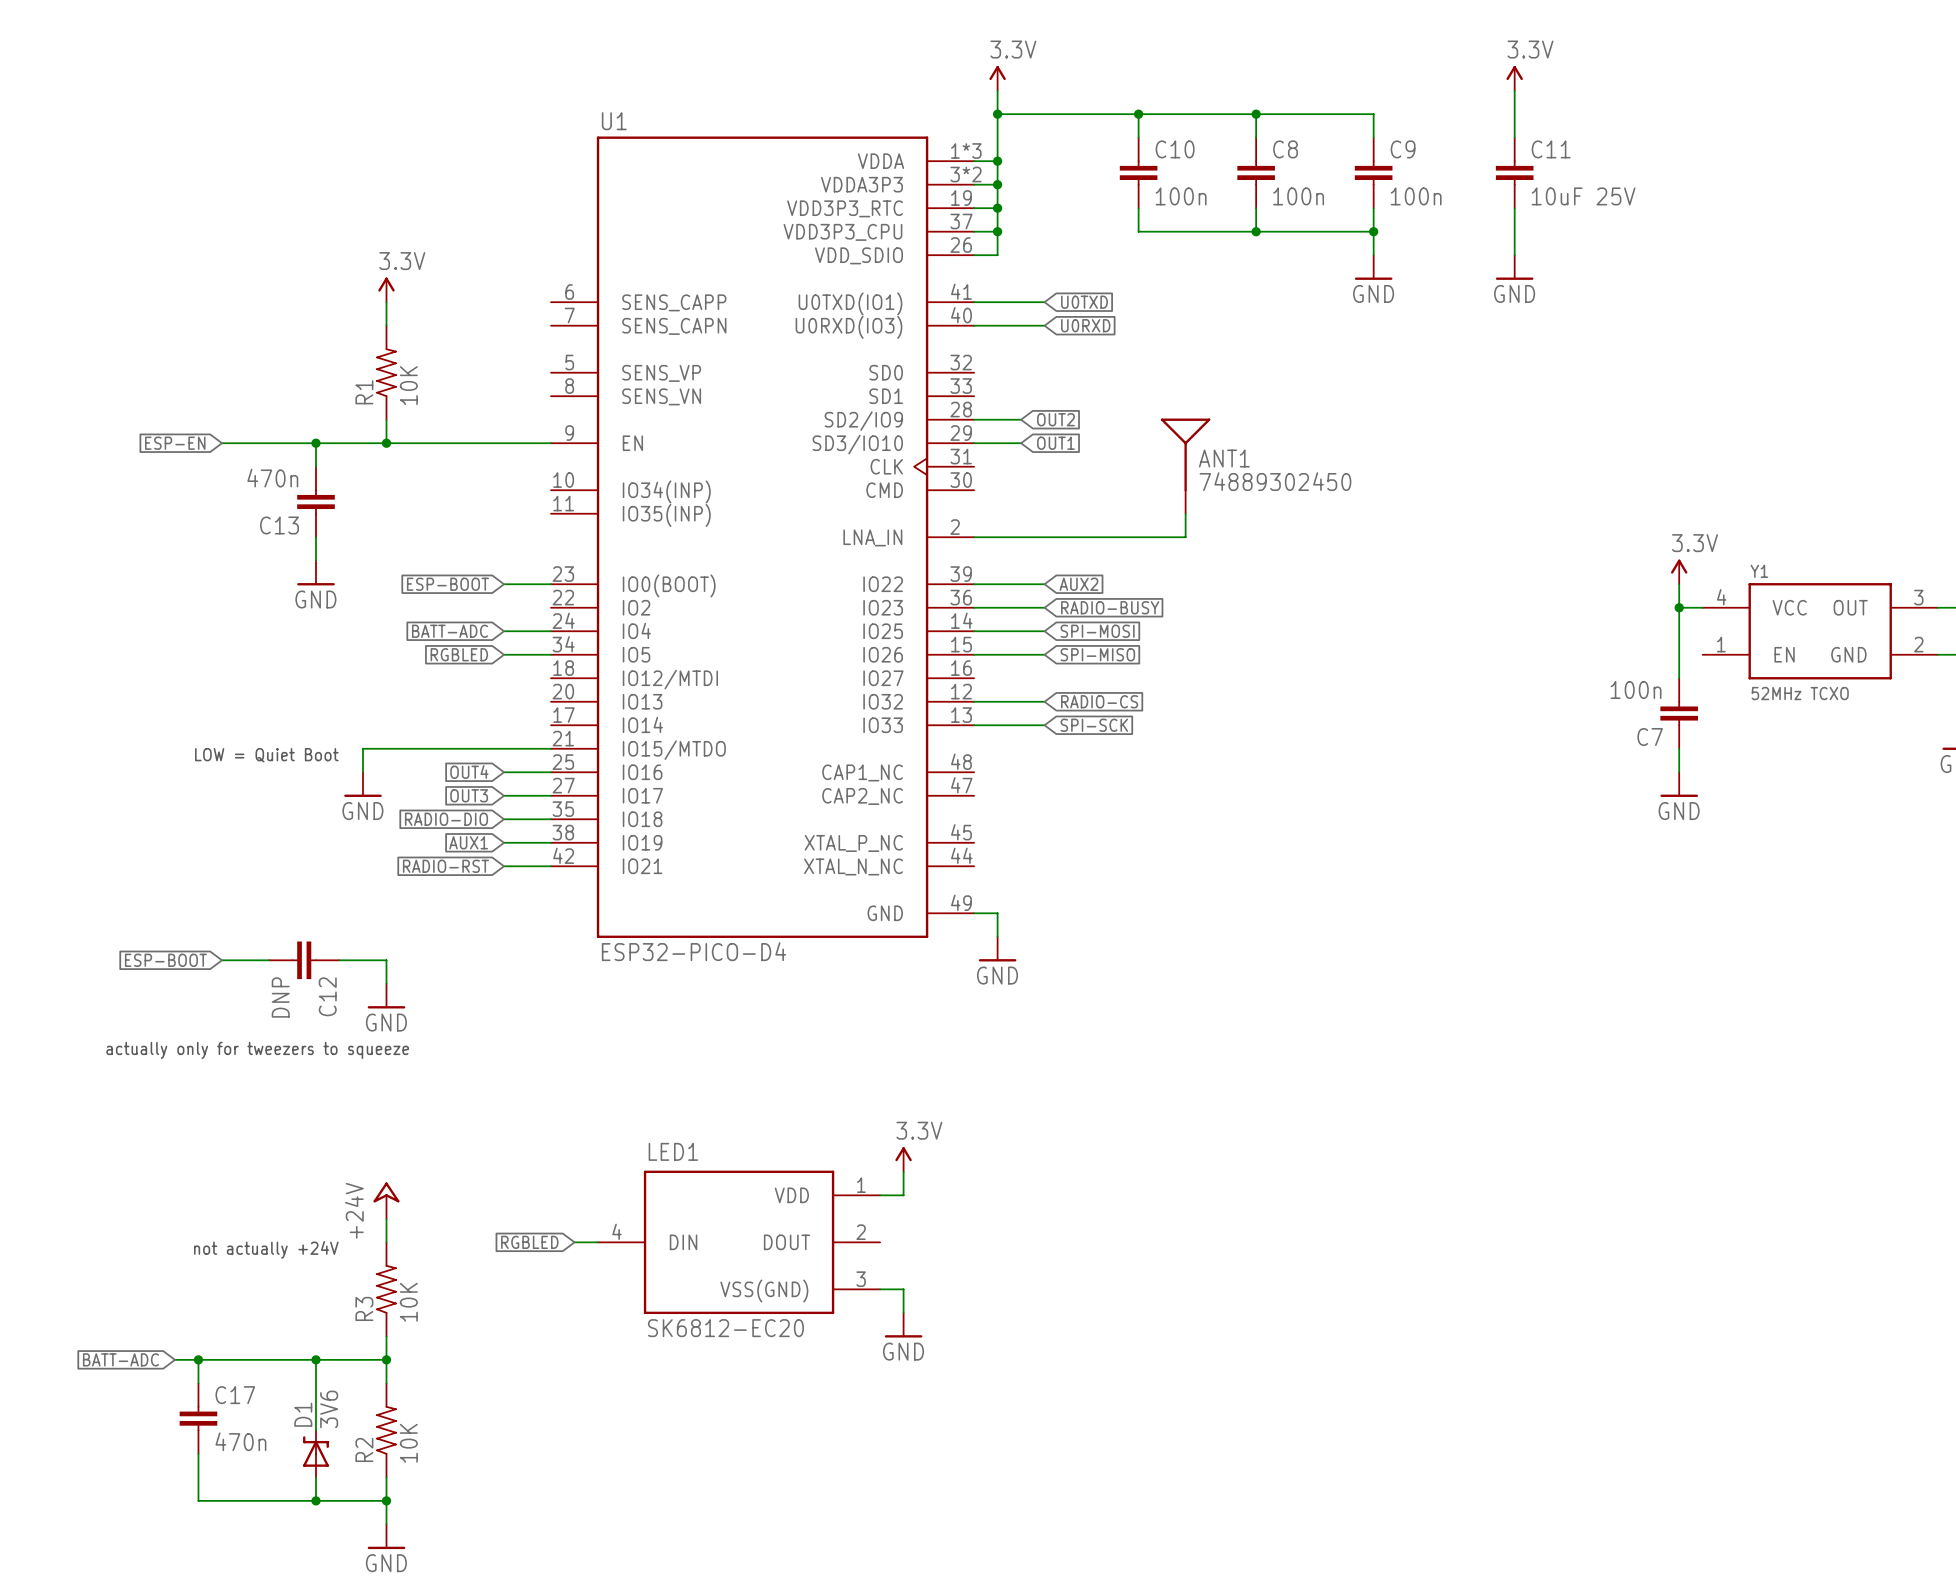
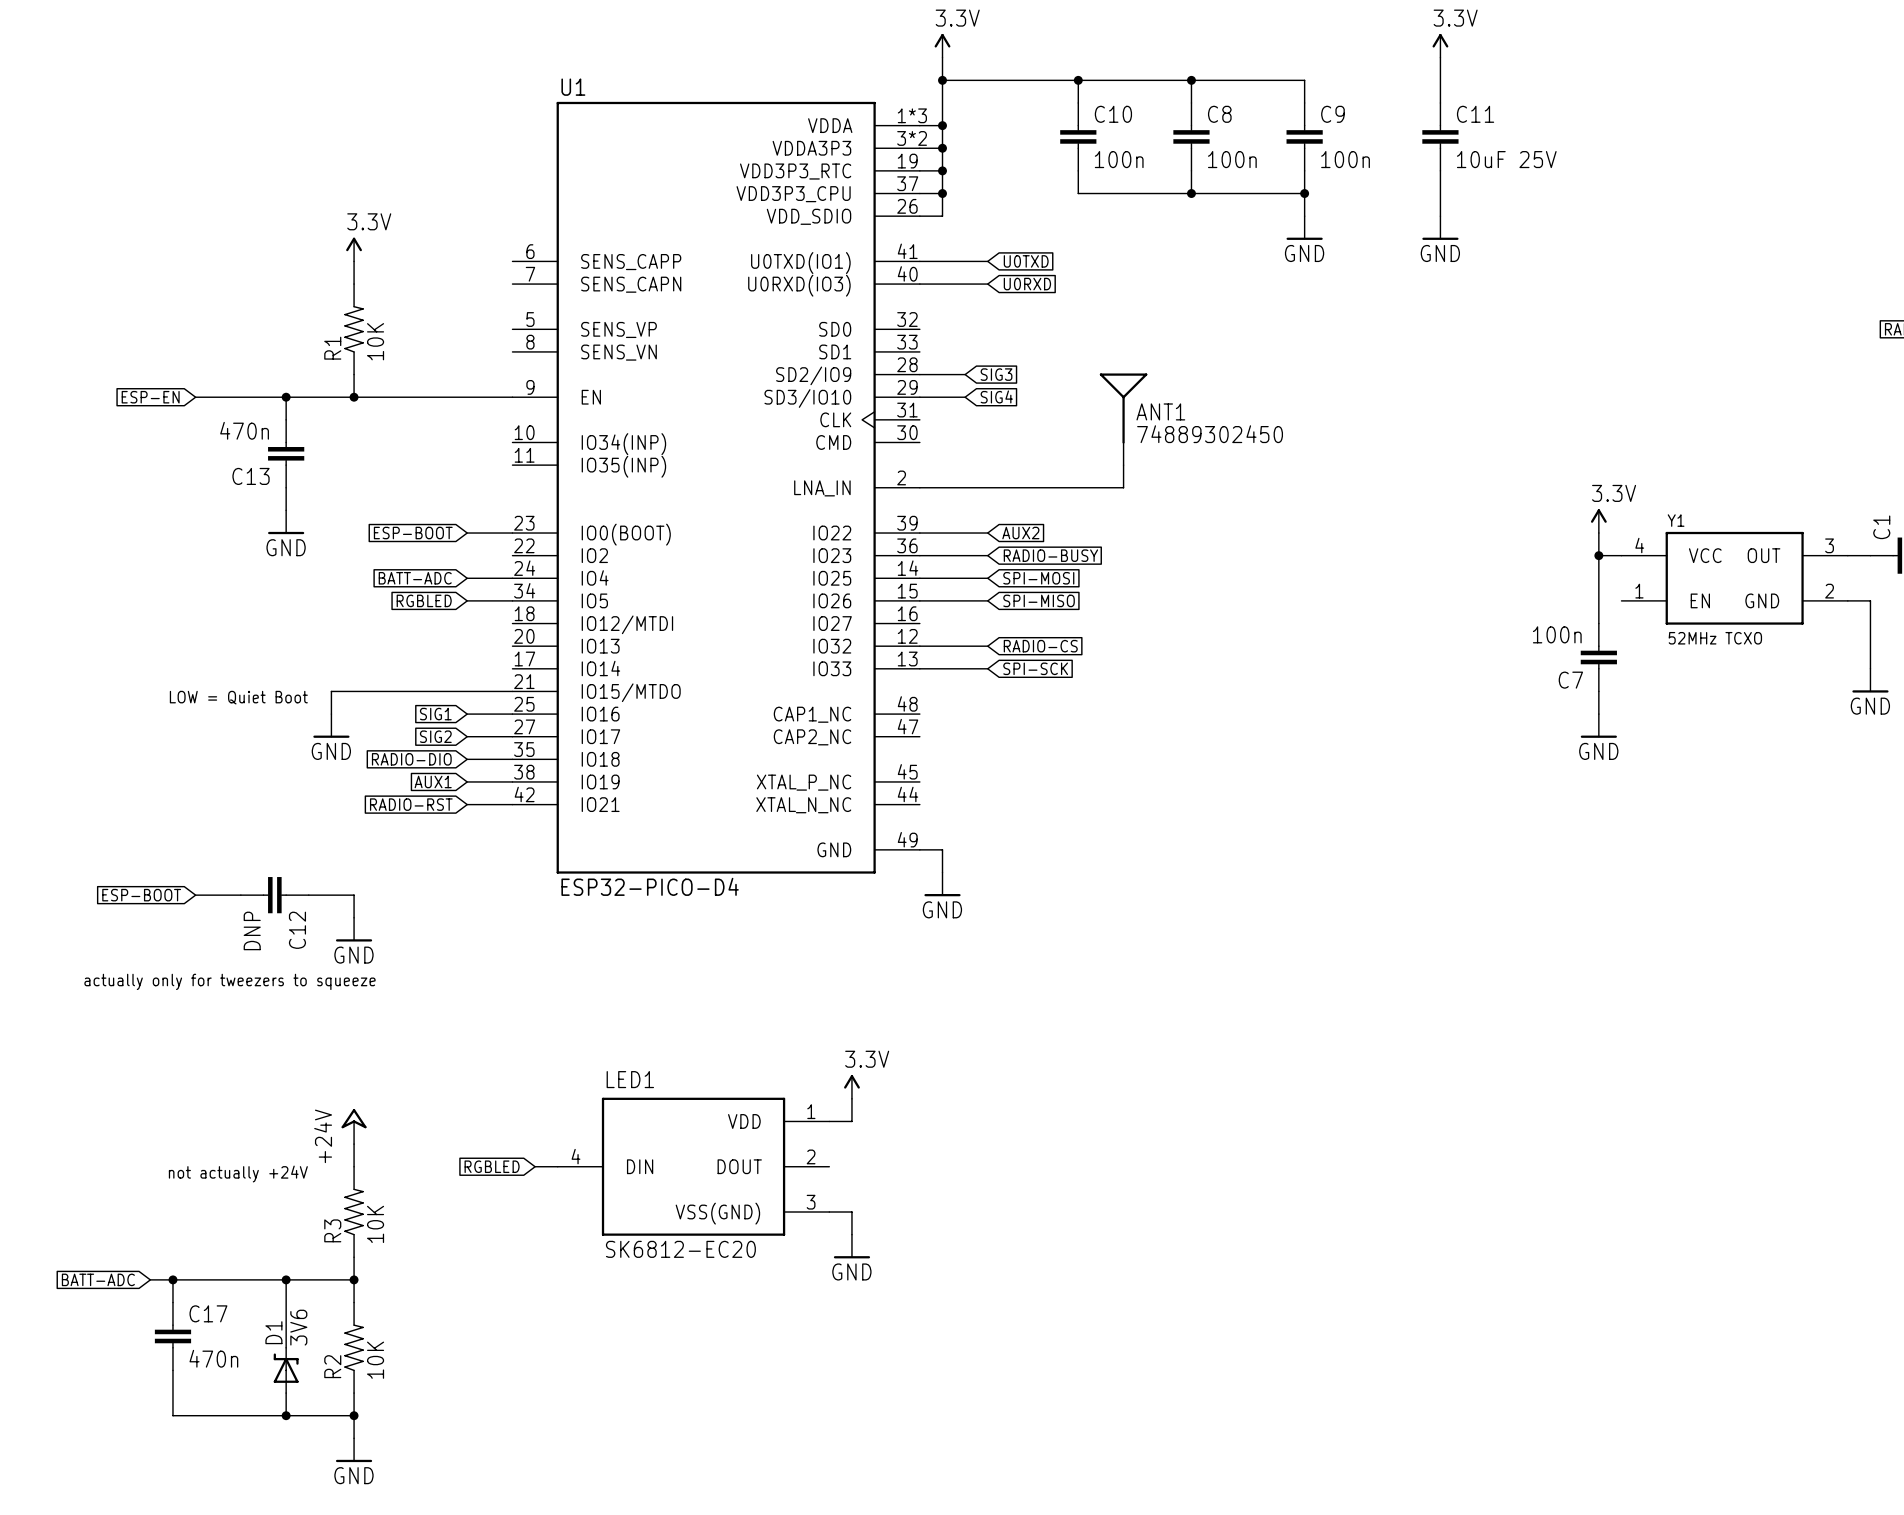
global label: OUT2 (1055, 419) -> SIG3 (996, 374)
global label: OUT1 (1055, 443) -> SIG4 (996, 396)
global label: OUT4 (469, 771) -> SIG1 (435, 714)
global label: OUT3 (469, 795) -> SIG2 (435, 736)

